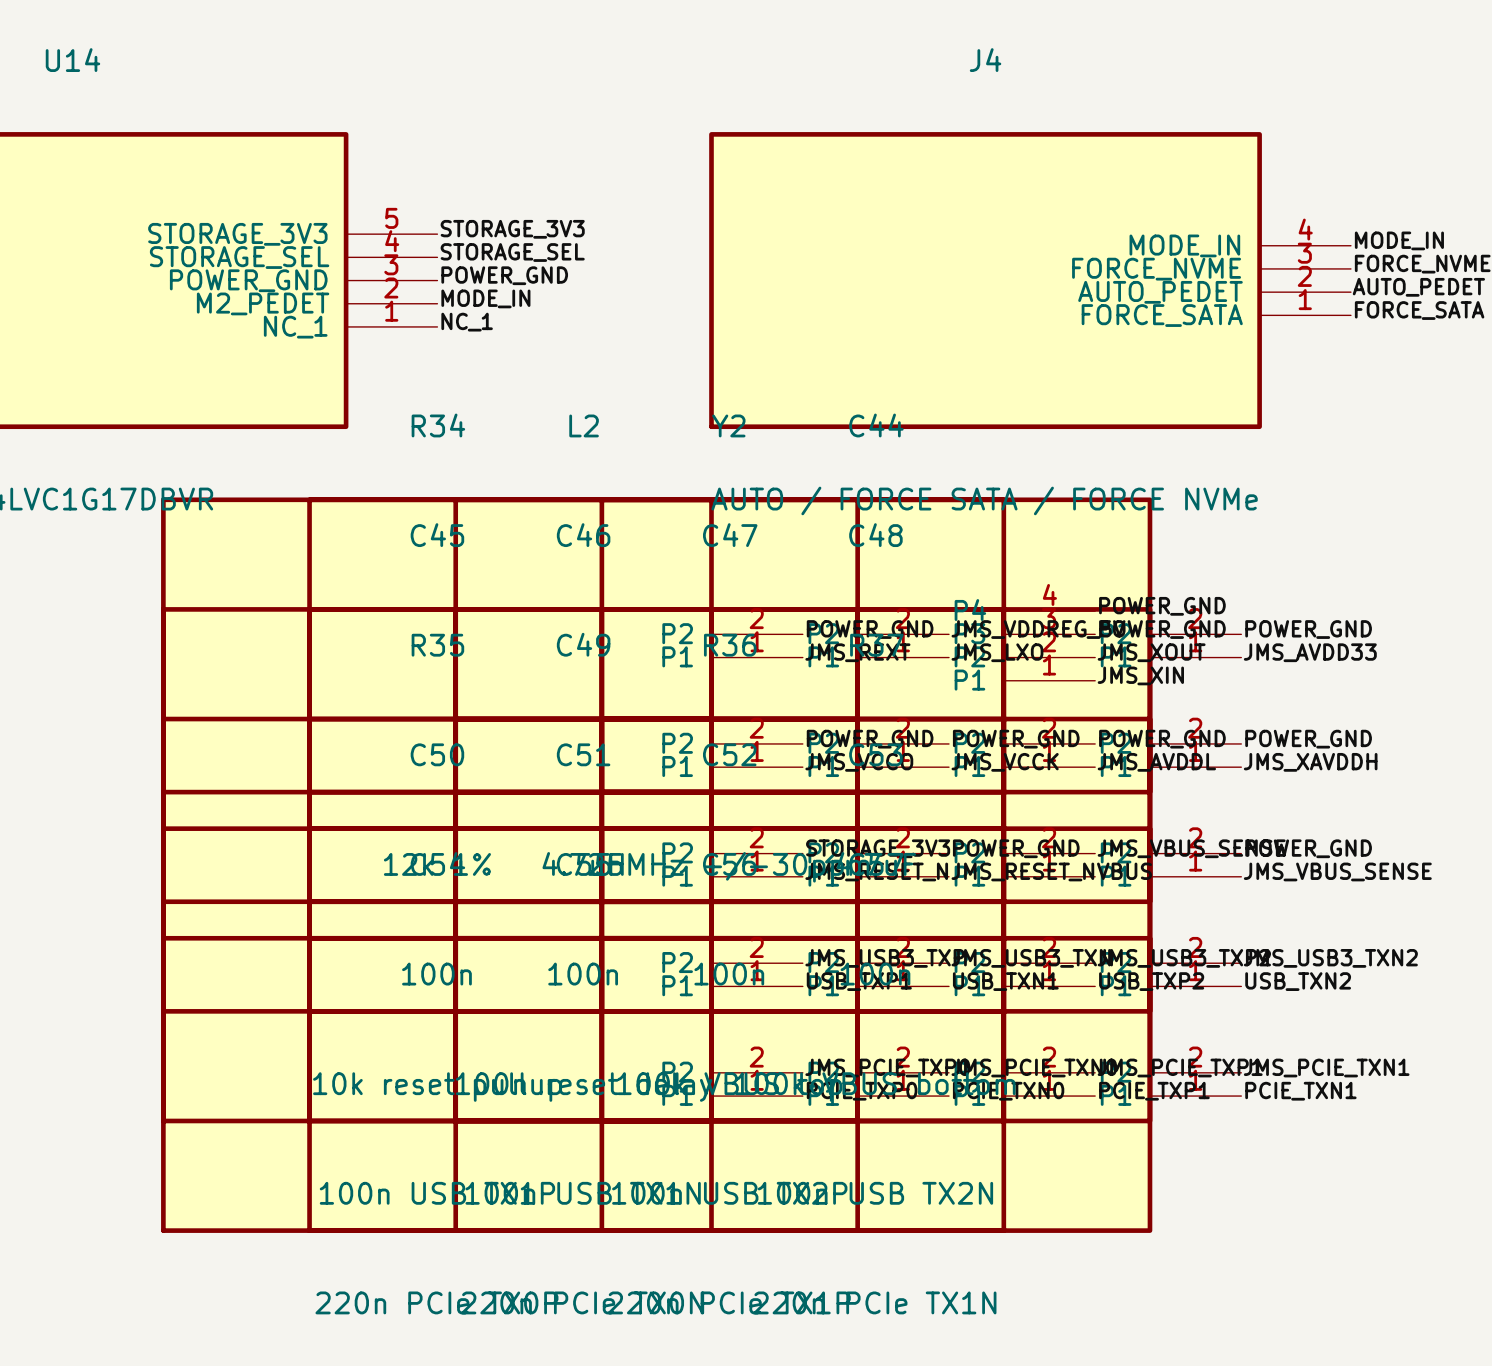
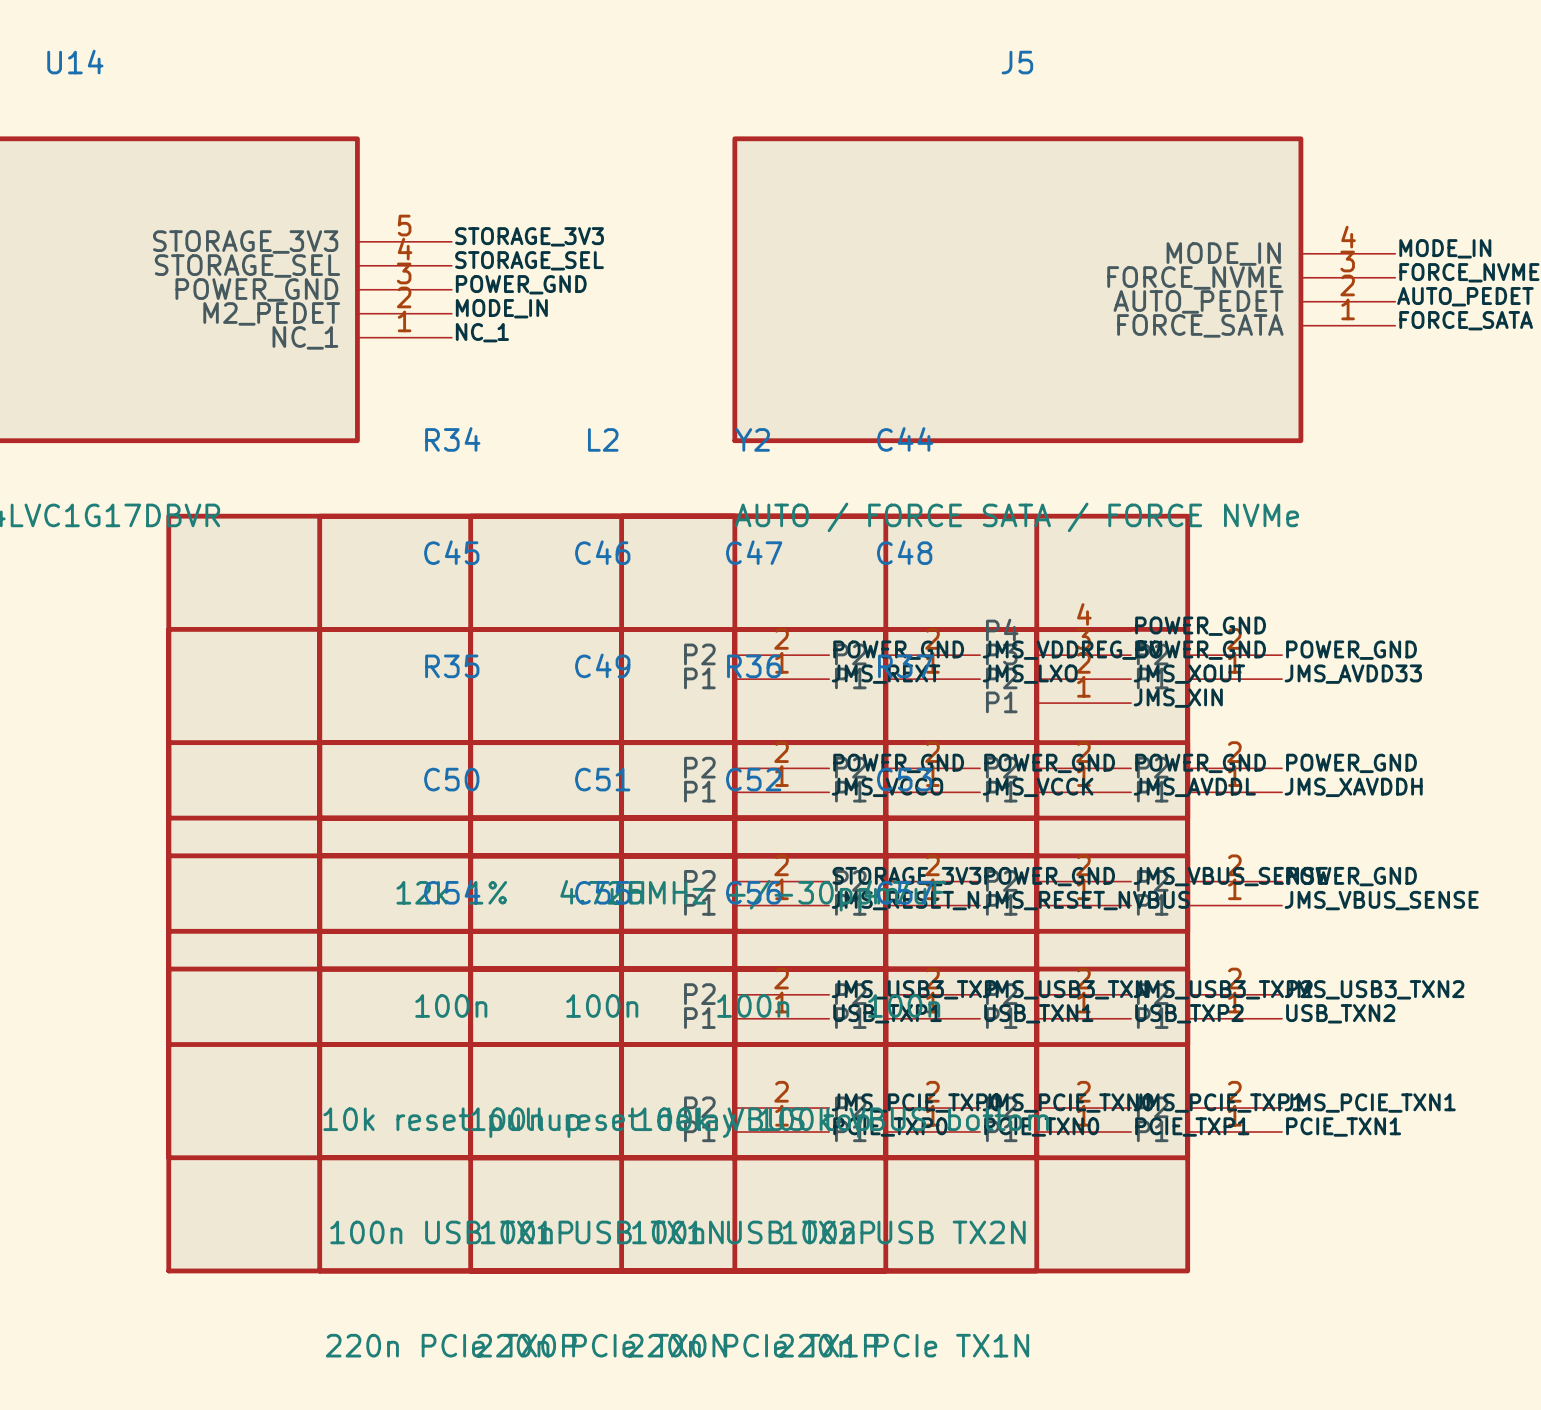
J4 name: J4 (985, 60) -> J5 (1017, 62)

